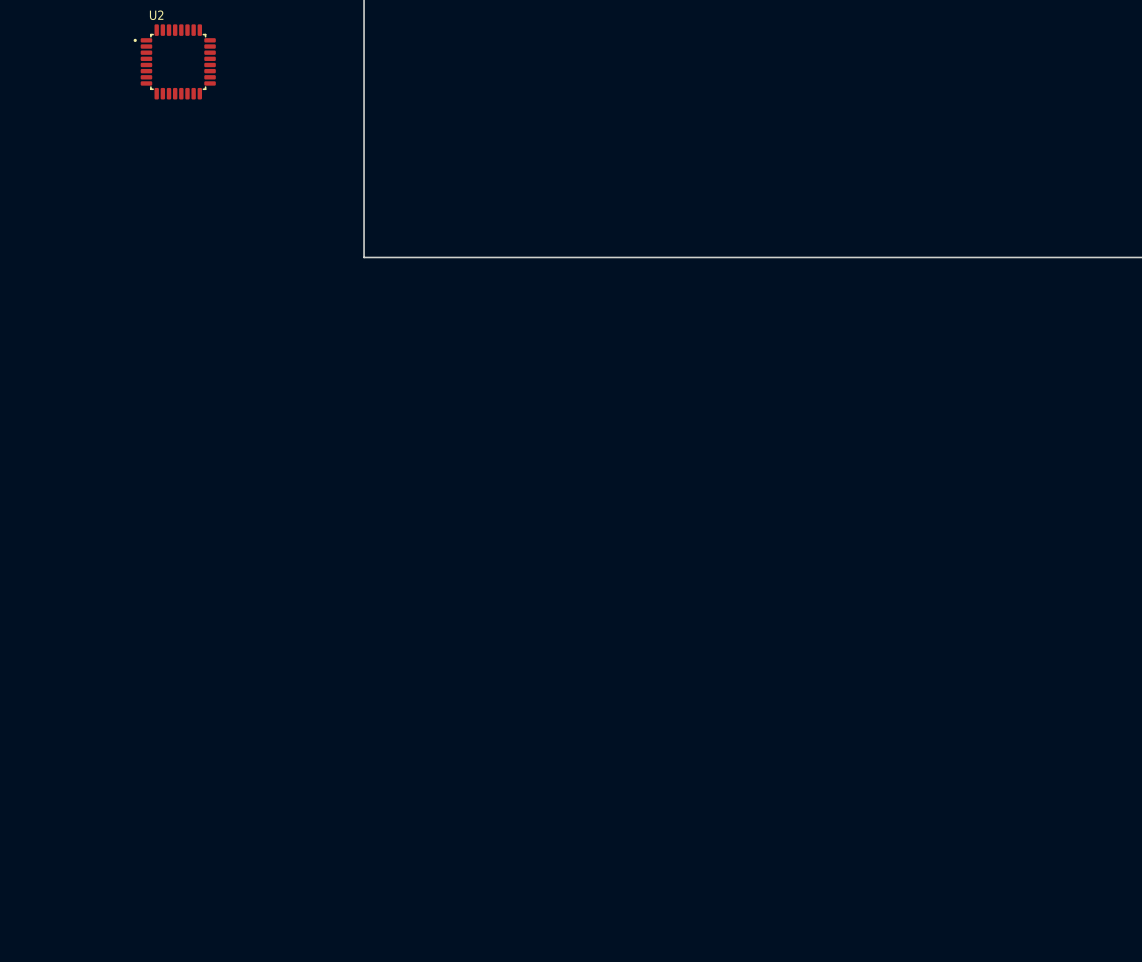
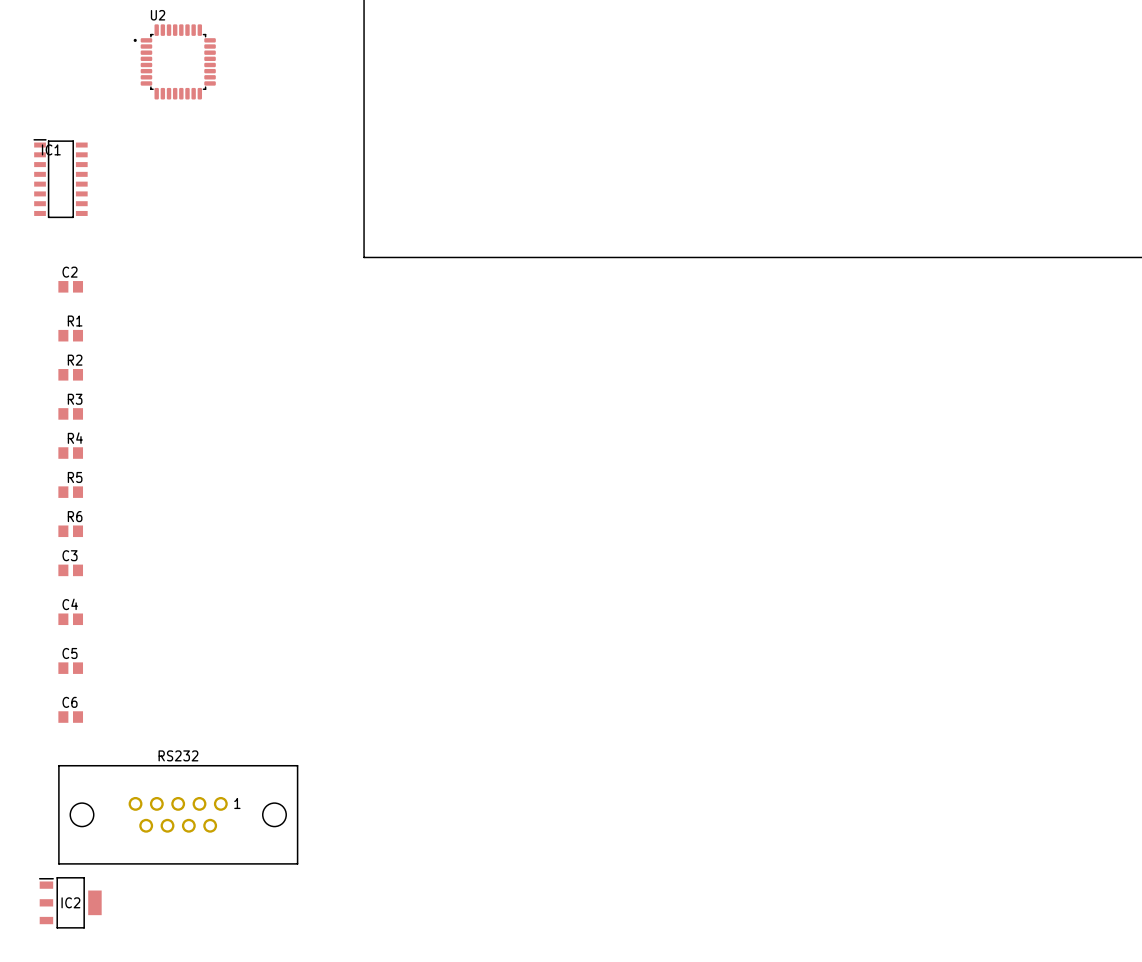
IC1: none -> (60, 178)
C2: none -> (70, 286)
R1: none -> (70, 335)
R2: none -> (70, 374)
R3: none -> (70, 413)
R4: none -> (70, 453)
R5: none -> (70, 492)
R6: none -> (70, 531)
C3: none -> (70, 570)
C4: none -> (70, 619)
C5: none -> (70, 668)
C6: none -> (70, 717)
RS232: none -> (178, 814)
IC2: none -> (70, 902)

